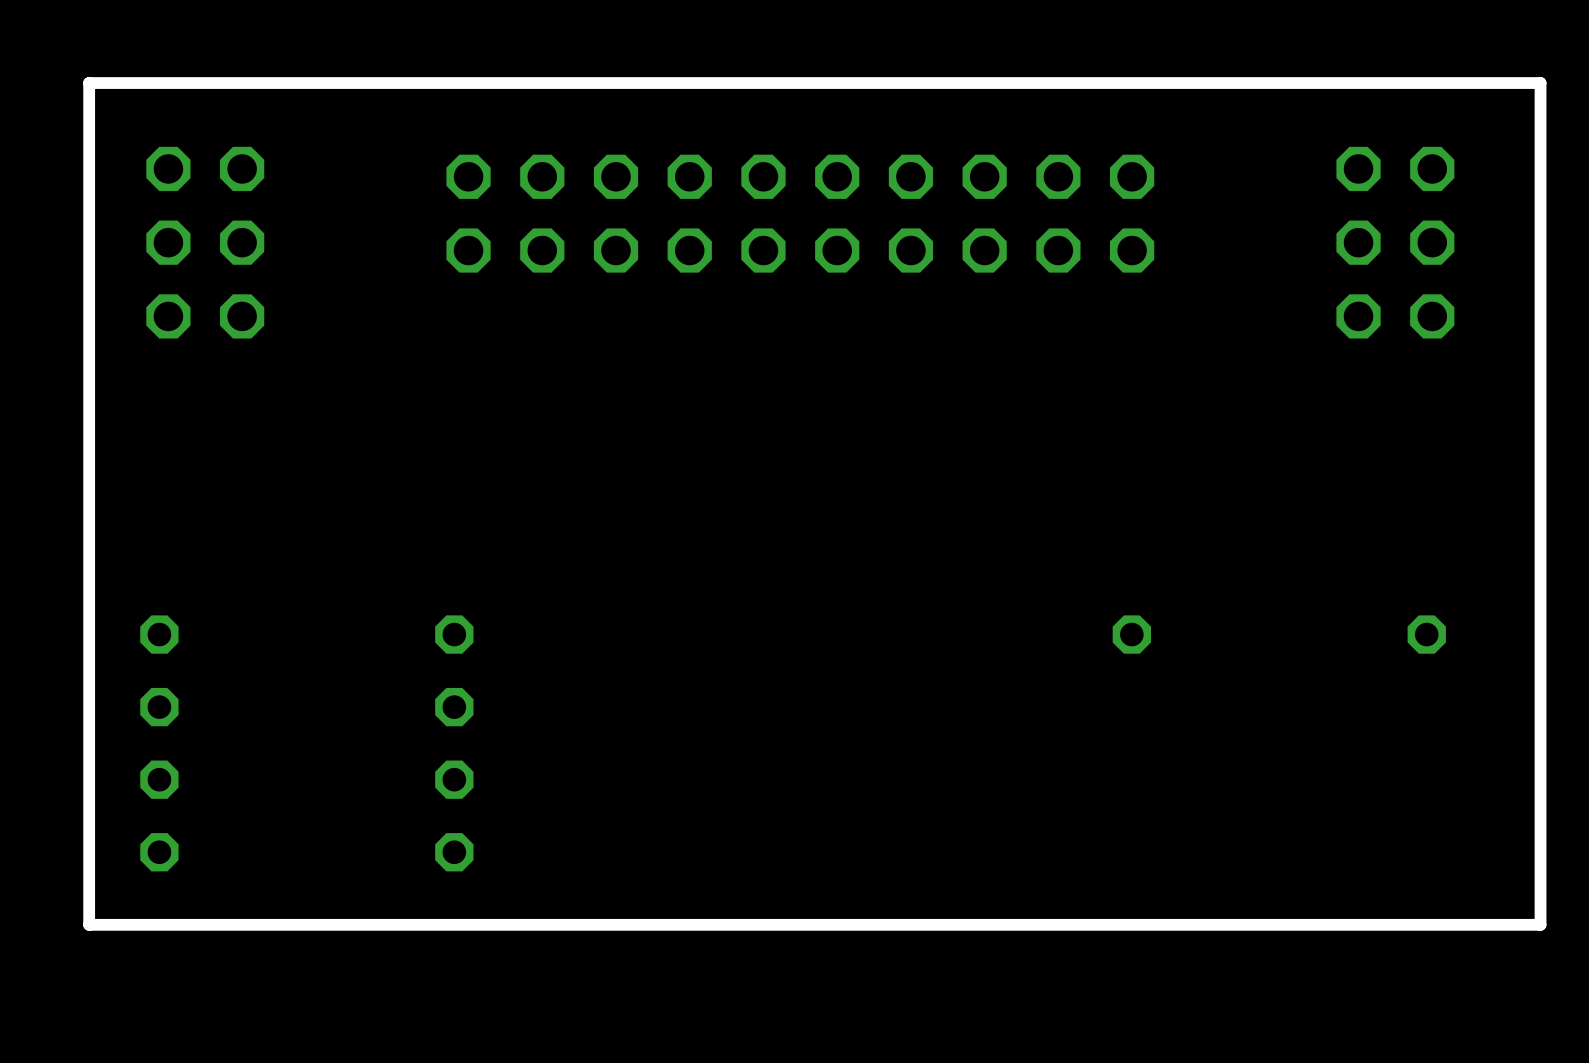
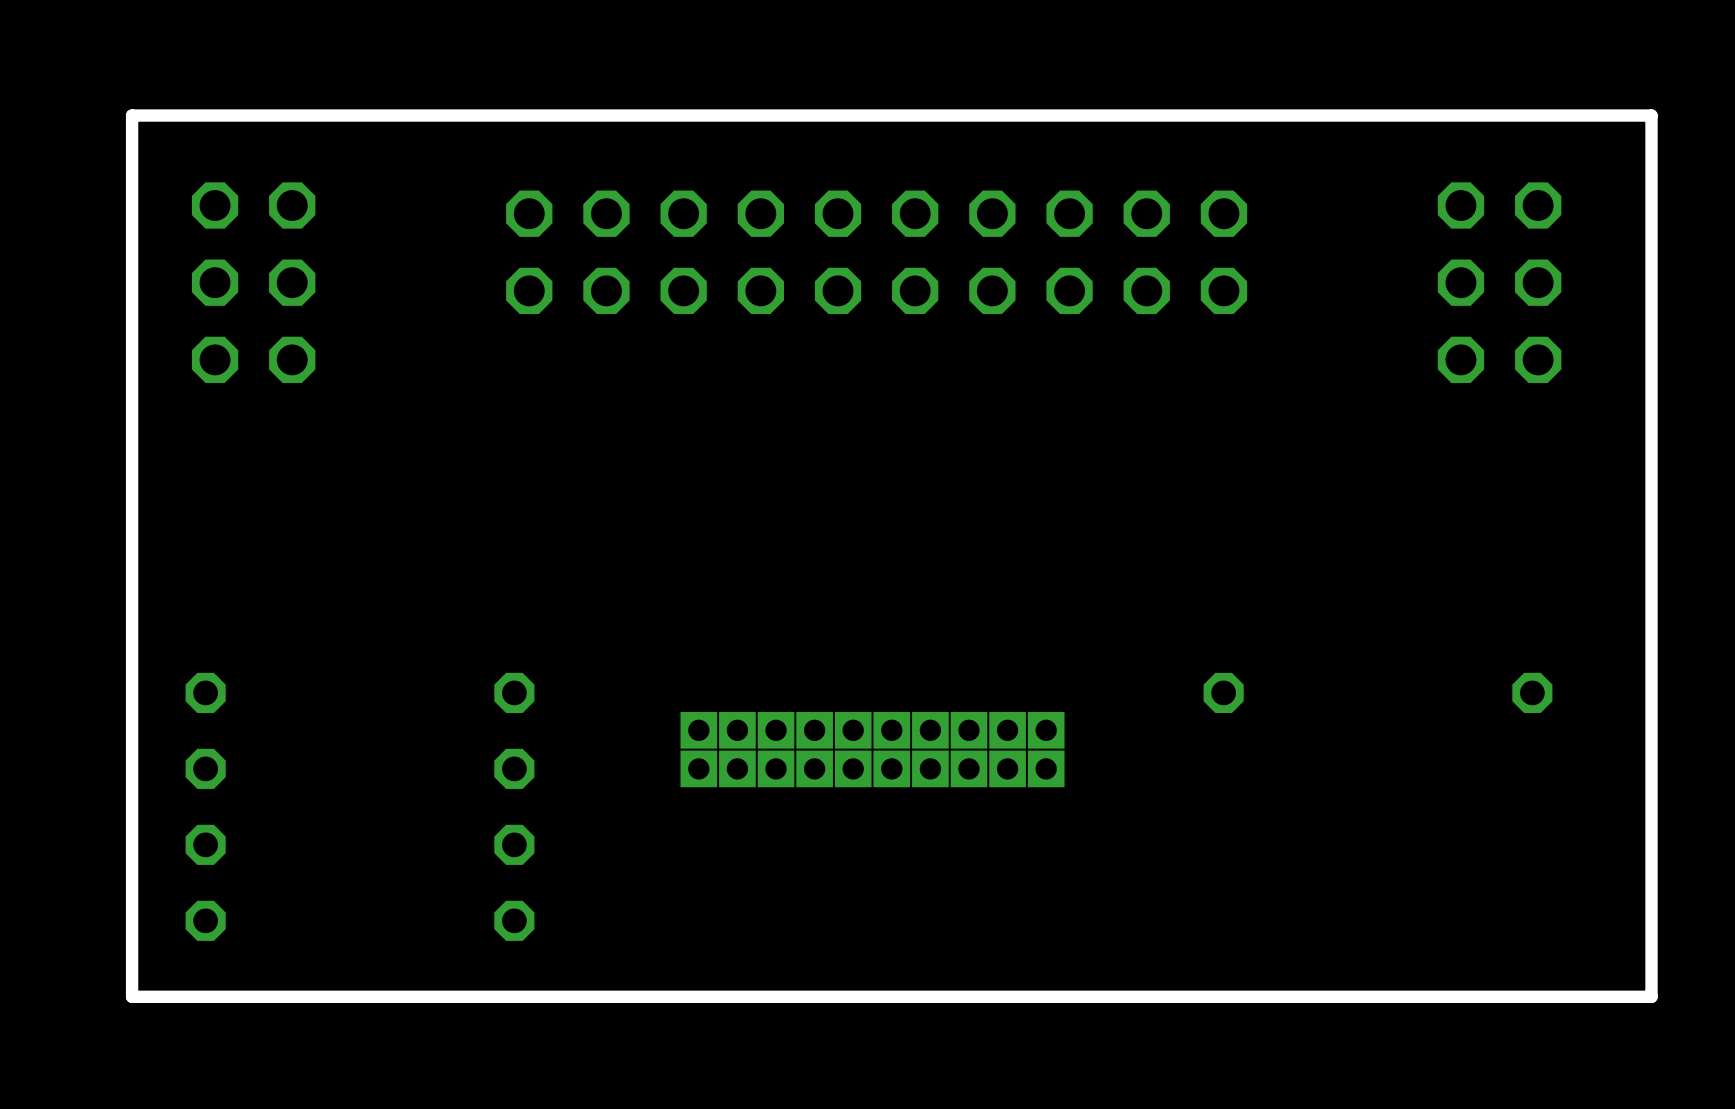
part: none -> (872, 749)

